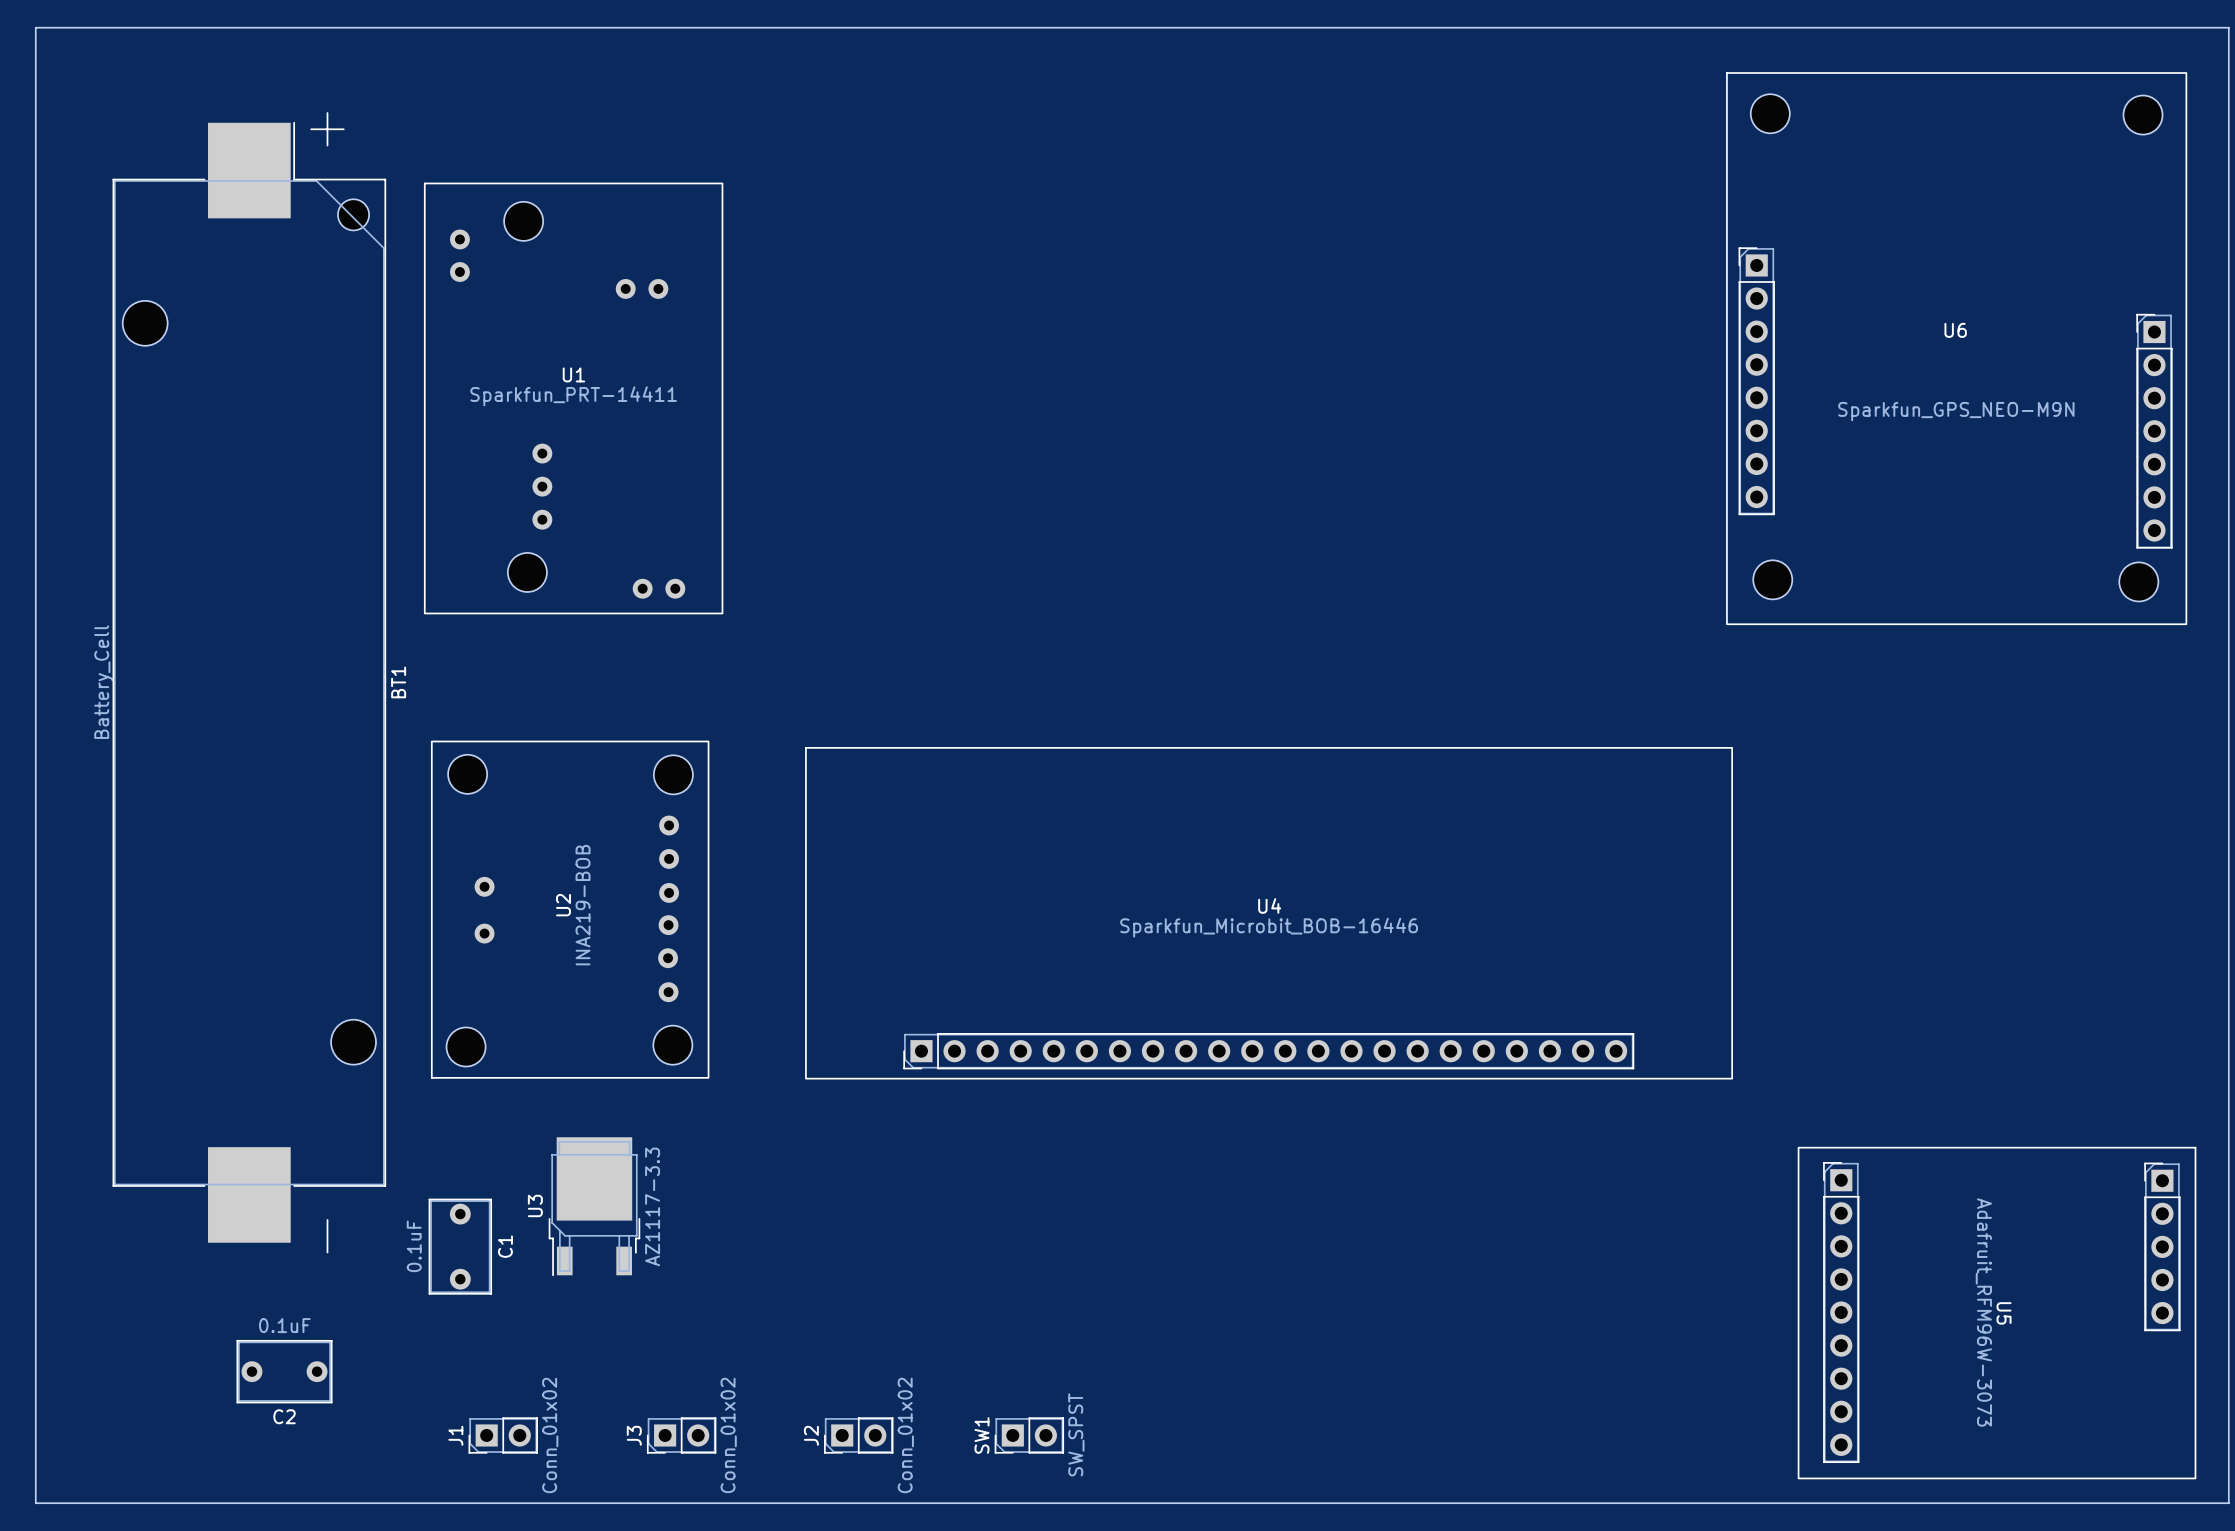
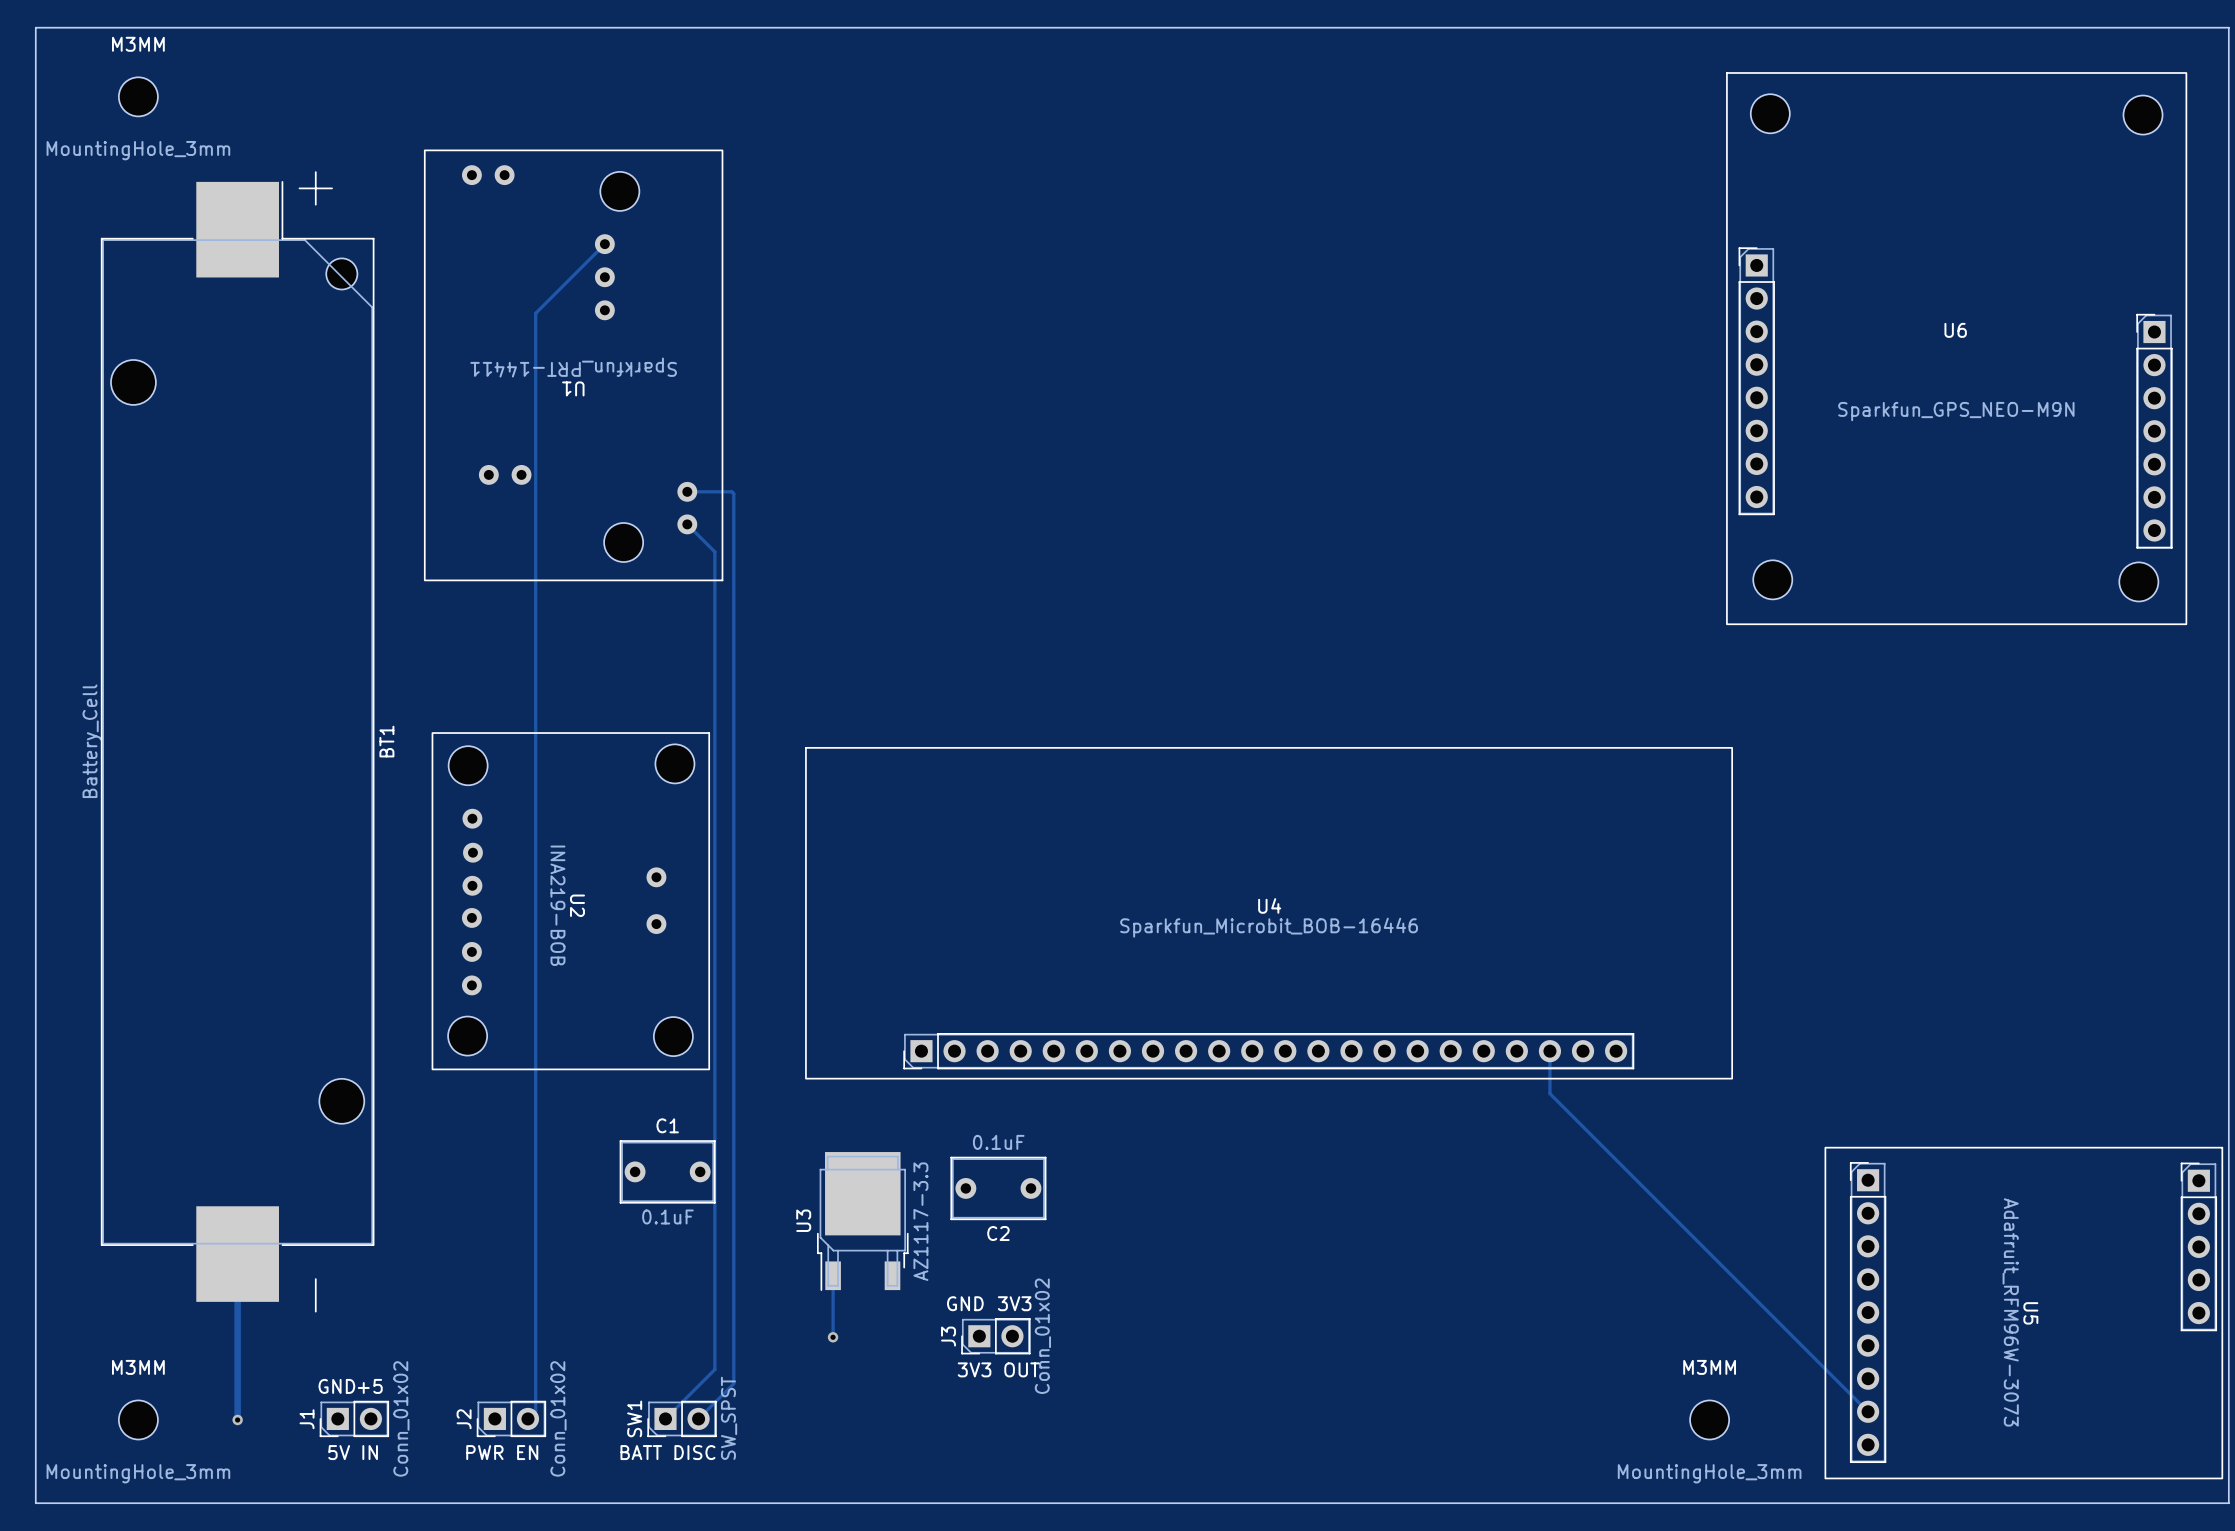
M3MM: none -> MountingHole_3mm (138, 96)
track: none -> (604, 244) (535, 313) (535, 1411) (527, 1418)
U1 rotation: 0° (573, 398) -> 180° (573, 365)
track: none -> (687, 491) (731, 491) (733, 493) (733, 1383) (698, 1418)
track: none -> (687, 524) (714, 551) (714, 1369) (665, 1418)
BT1 position: (249, 682) -> (237, 741)
U2 rotation: 0° (570, 909) -> 180° (570, 901)
track: none -> (1549, 1051) (1549, 1093) (1868, 1411)
U5 footprint: [1797, 1146, 2197, 1480] -> [1824, 1146, 2224, 1480]
U3 position: (594, 1206) -> (862, 1221)
C1 value position: 0.1uF (414, 1246) -> 0.1uF (667, 1216)
C1 rotation: 0° (460, 1246) -> 90° clockwise (667, 1171)
C1 position: (460, 1246) -> (667, 1171)
C1 name position: C1 (505, 1246) -> C1 (667, 1125)
track: none -> (237, 1254) (237, 1419)
track: none -> (833, 1275) (833, 1337)
text: none -> GND (965, 1303)
text: none -> 3V3 (1014, 1303)
via: none -> (833, 1337)
text: none -> 3V3 OUT (998, 1369)
C2 position: (284, 1371) -> (998, 1188)
text: none -> GND (336, 1386)
text: none -> +5 (370, 1386)
M3MM: none -> MountingHole_3mm (138, 1419)
via: none -> (237, 1419)
M3MM: none -> MountingHole_3mm (1709, 1419)
J1 position: (503, 1435) -> (354, 1418)
J3 position: (681, 1435) -> (995, 1336)
J2 position: (858, 1435) -> (511, 1418)
SW1 position: (1029, 1435) -> (682, 1418)
text: none -> 5V IN (353, 1452)
text: none -> PWR EN (502, 1452)
text: none -> BATT DISC (667, 1452)

